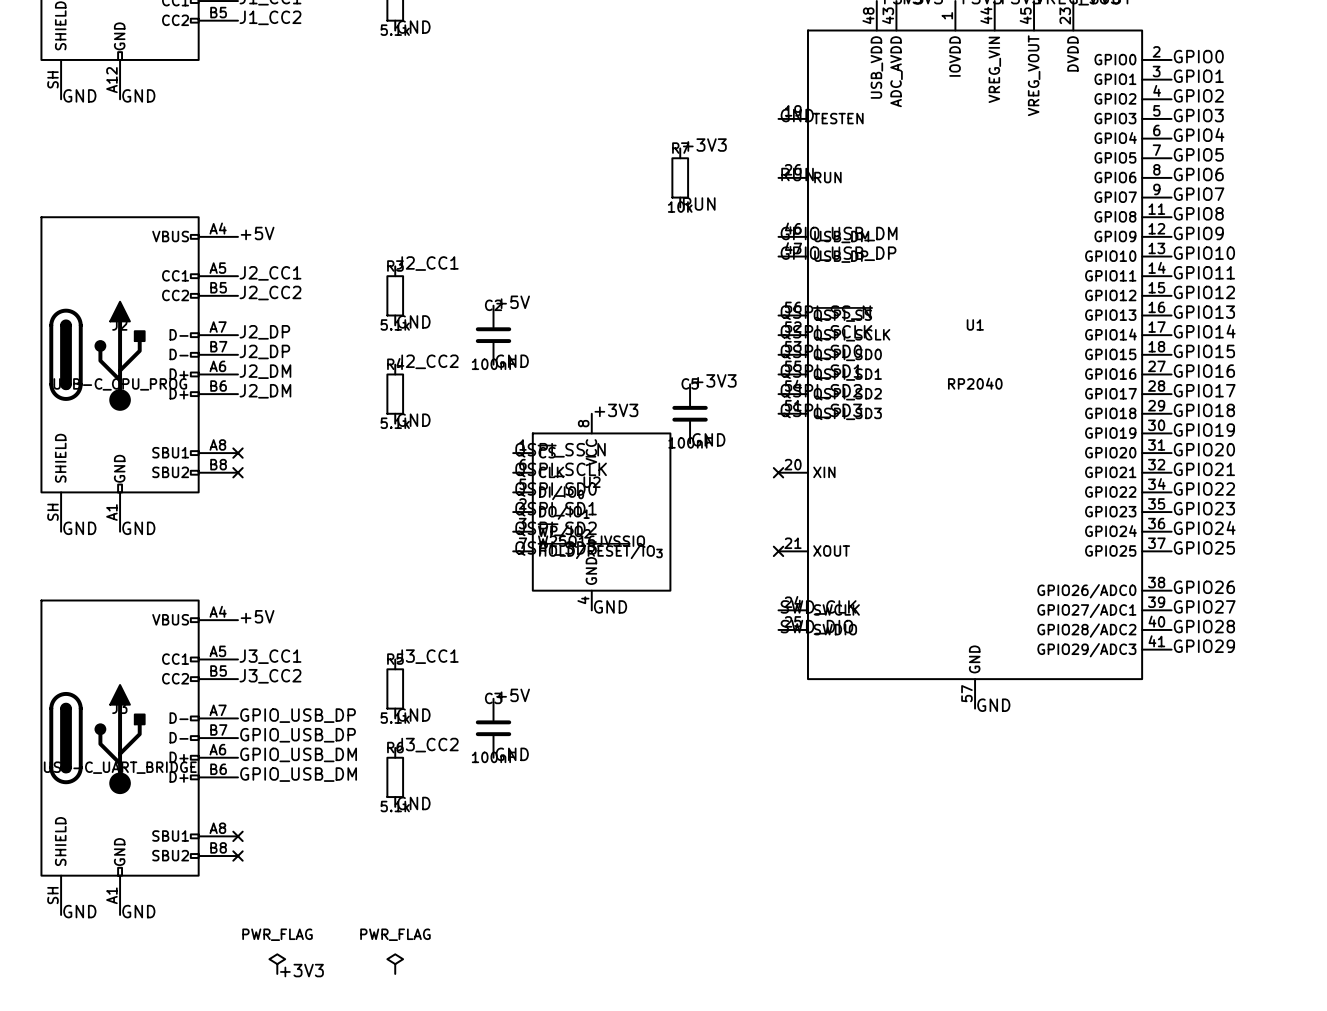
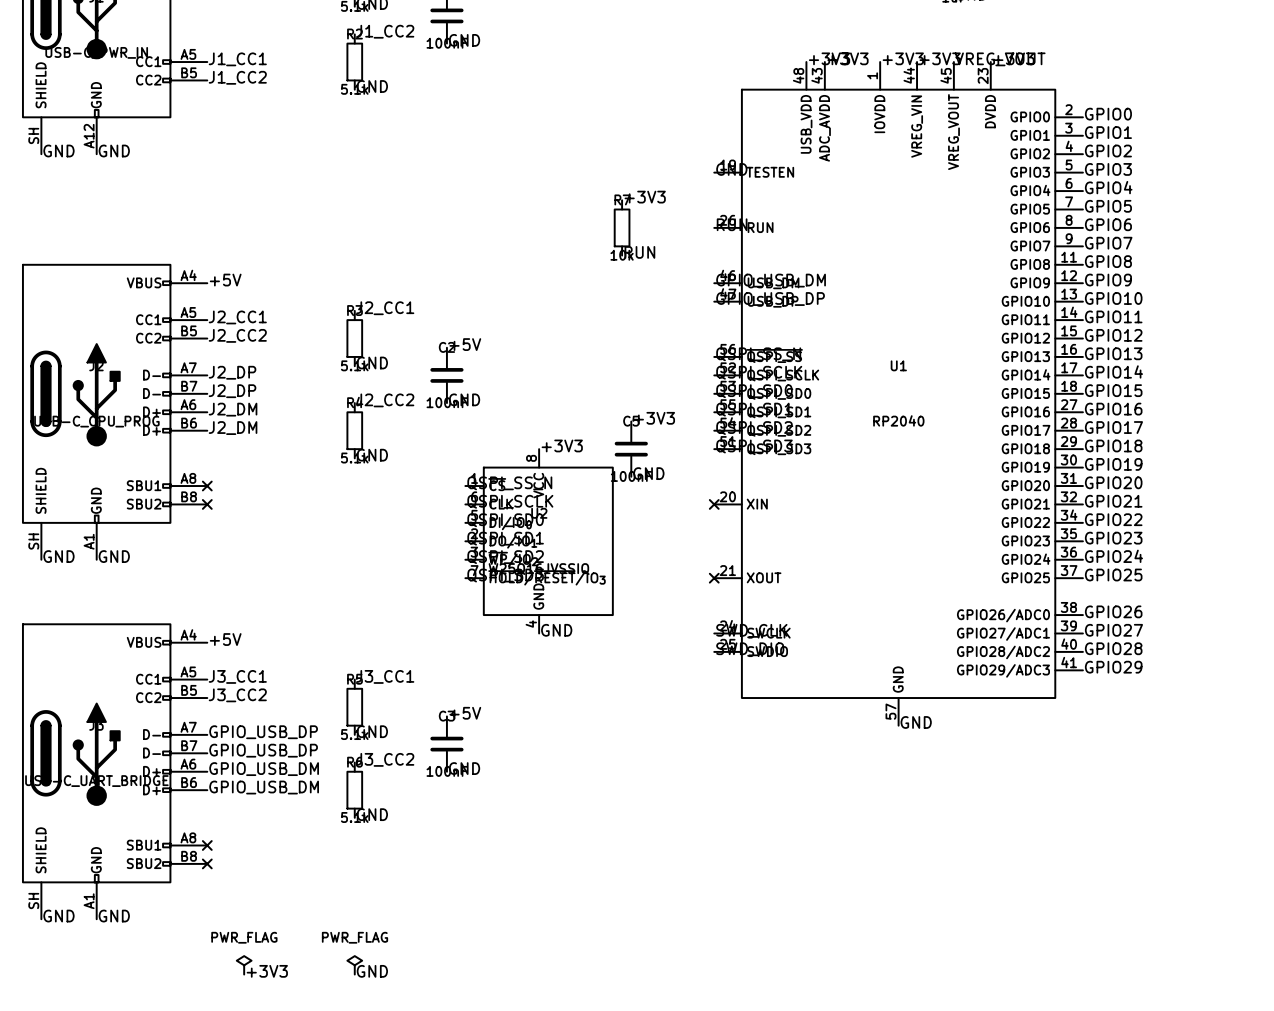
label: none -> GND (372, 971)

